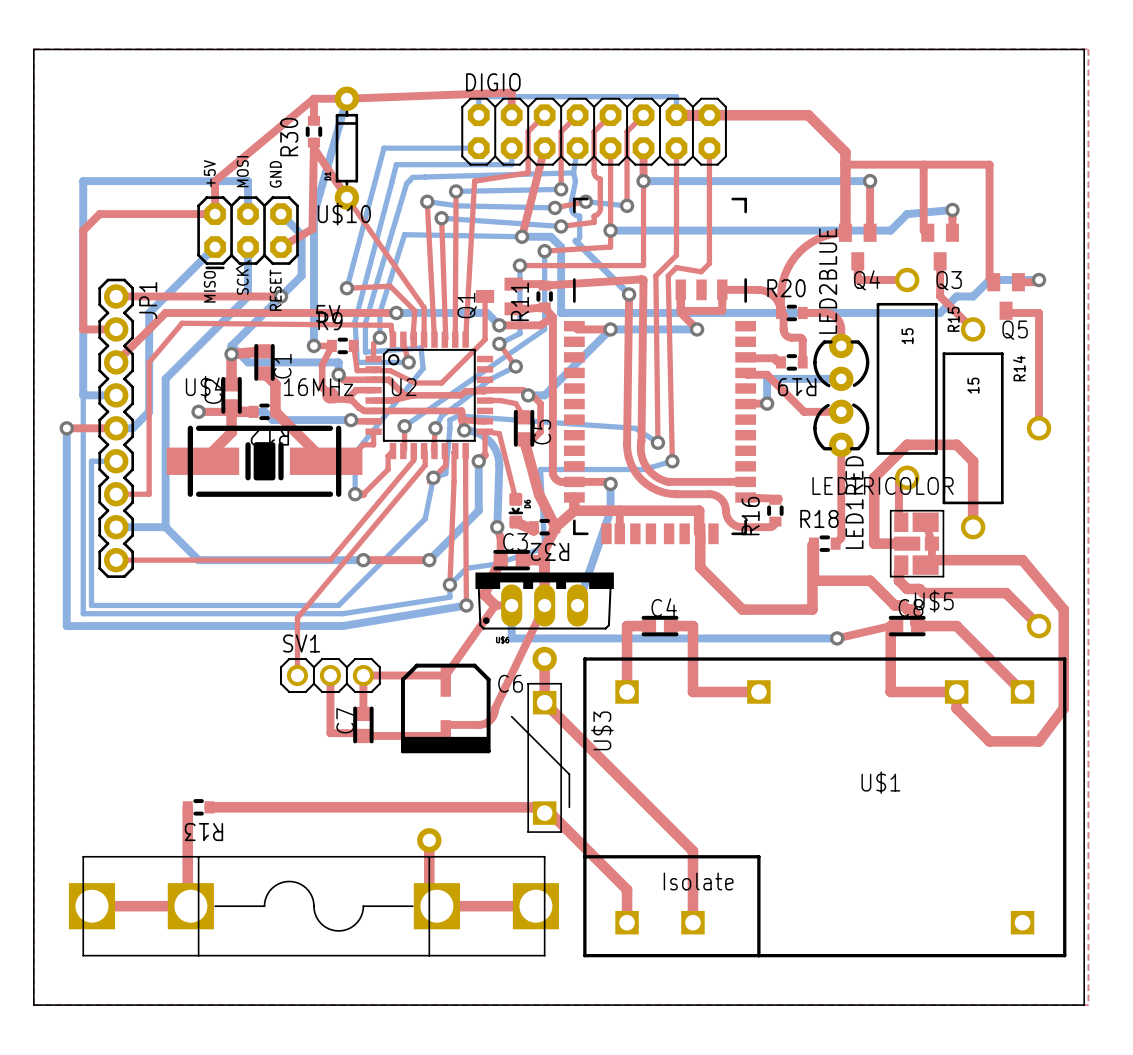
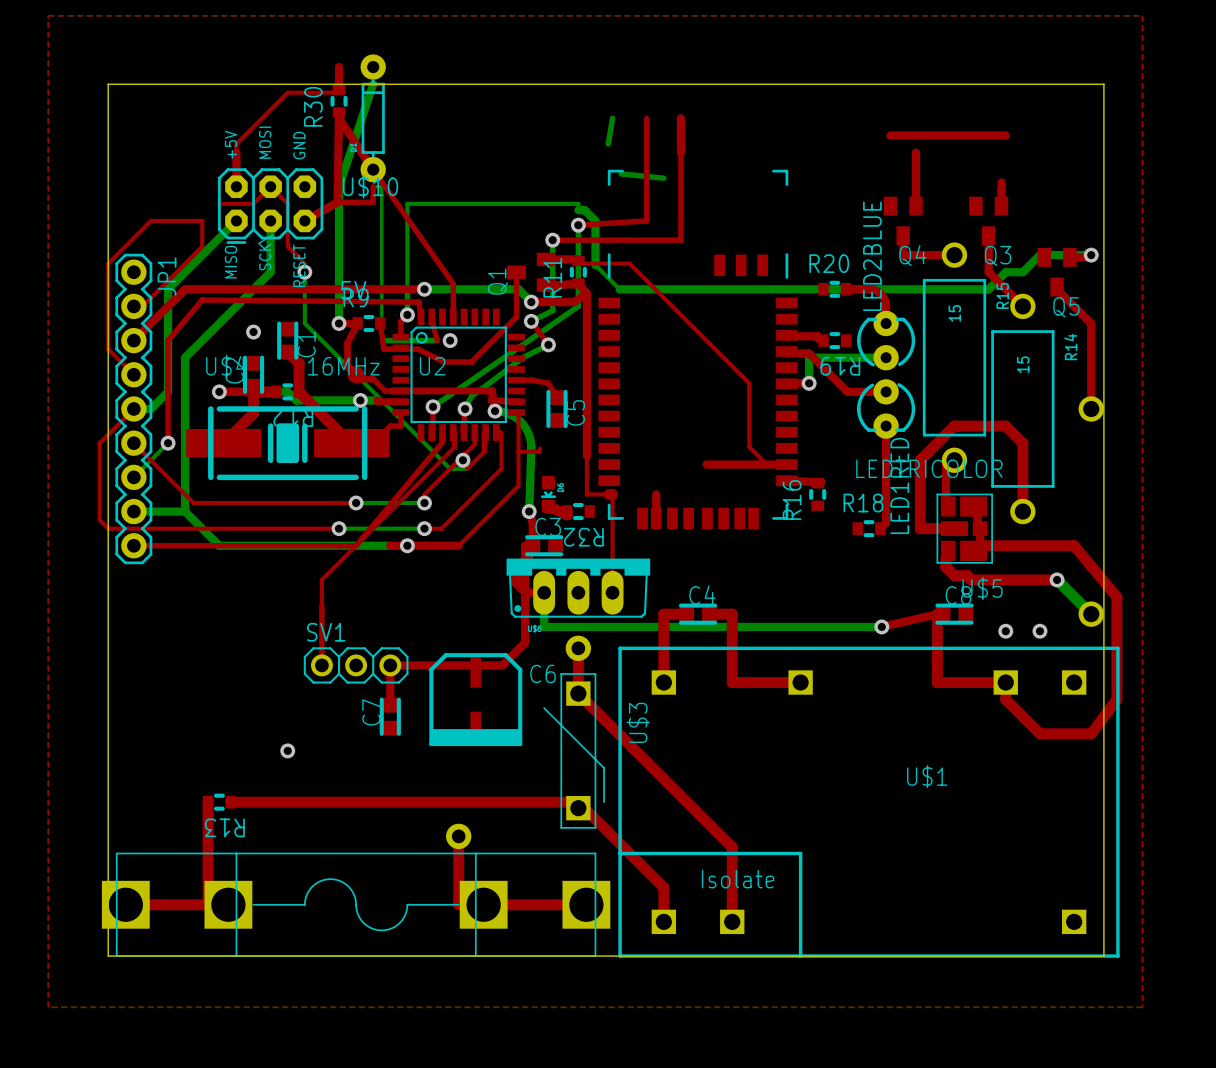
board edge: (33, 49) (1084, 49) (1084, 1005) (33, 1005) (33, 49) -> (108, 84) (108, 956) (1103, 956) (1103, 84) (108, 84)
bottom track: (346, 98) (313, 214) -> (373, 84) (339, 186)
bottom track: (478, 115) (478, 96) (676, 96) (676, 115) -> none
top track: (511, 115) (511, 92) (313, 98) (215, 181) -> (339, 89) (336, 92) (287, 92) (236, 143) (236, 152)
top track: (544, 115) (528, 131) (528, 172) (474, 181) (465, 339) -> none
top track: (577, 115) (561, 131) (561, 189) -> none
top track: (610, 115) (594, 131) (594, 172) (596, 176) (600, 179) (599, 211) (594, 216) (594, 222) (561, 226) -> none
top track: (643, 115) (627, 131) (627, 205) -> none
top track: (676, 115) (808, 115) (845, 152) (845, 232) (831, 234) (817, 239) (805, 246) (795, 257) (787, 269) (782, 282) (780, 312) -> none
DIGIO: (594, 131) -> none
bottom track: (478, 148) (383, 148) (346, 288) -> none
bottom track: (511, 148) (511, 164) (396, 164) (355, 321) (357, 362) -> (373, 186) (381, 186) (381, 340) (383, 340)
top track: (544, 148) (522, 236) -> none
top track: (676, 148) (676, 255) (655, 275) (657, 442) -> none
top track: (709, 148) (709, 263) (701, 271) (676, 267) (668, 275) (672, 461) -> none
top track: (923, 164) (923, 230) -> none
top track: (956, 164) (989, 164) (989, 278) (993, 282) -> none
bottom track: (409, 180) (412, 177) (573, 172) (575, 181) (571, 208) (574, 214) (579, 216) (579, 237) (575, 240) (629, 294) -> none
bottom track: (409, 180) (406, 183) (365, 323) (365, 352) (421, 347) (423, 368) (355, 453) (355, 494) -> none
bottom track: (643, 181) (870, 181) -> none
via: (643, 181) -> none
via: (870, 181) -> none
bottom track: (561, 189) (456, 191) -> none
via: (561, 189) -> none
top track: (456, 191) (455, 339) -> none
via: (456, 191) -> none
top track: (427, 201) (434, 339) -> none
bottom track: (427, 201) (458, 205) (554, 207) -> none
via: (427, 201) -> none
top track: (585, 201) (554, 207) -> none
via: (585, 201) -> none
via: (627, 205) -> none
via: (554, 207) -> none
bottom track: (952, 209) (907, 214) (890, 230) (610, 230) -> none
via: (952, 209) -> none
top track: (215, 214) (99, 214) (83, 230) (83, 329) (116, 329) -> (133, 374) (108, 349) (108, 263) (150, 220) (202, 220) (202, 246) (142, 306) (133, 306)
bottom track: (248, 214) (248, 181) (83, 181) (83, 395) -> none
bottom track: (281, 214) (301, 234) (301, 275) (231, 345) -> none
top track: none -> (373, 186) (373, 202) (337, 202)
top track: (441, 218) (445, 338) -> none
bottom track: (441, 218) (561, 226) -> none
via: (441, 218) -> none
via: (561, 226) -> none
top track: none -> (219, 203) (253, 203) (270, 186) (287, 203) (287, 246) (304, 263)
via: (610, 230) -> none
via: (522, 236) -> none
bottom track: (544, 236) (404, 234) (379, 312) -> (578, 210) (578, 203) (407, 203) (407, 289)
top track: (544, 285) (643, 280) (641, 454) (644, 462) (652, 473) (668, 481) -> (578, 260) (578, 263) (629, 263) (749, 383) (749, 446) (766, 464)
bottom track: none -> (304, 263) (304, 323) (450, 468) (467, 468)
top track: (346, 288) (390, 286) (414, 310) (412, 338) -> none
via: (346, 288) -> none
bottom track: (561, 289) (561, 312) (584, 312) -> (595, 265) (619, 289)
top track: (629, 294) (627, 444) (628, 457) (633, 469) (646, 484) (663, 492) (711, 494) (717, 496) (724, 504) (728, 518) (736, 525) (770, 527) (775, 521) -> none
via: (629, 294) -> none
top track: (116, 296) (281, 296) -> none
top track: (780, 312) (783, 314) (785, 334) (789, 337) (802, 339) (802, 362) -> none
top track: (780, 312) (779, 304) (774, 296) (766, 291) (757, 289) (722, 289) (721, 310) (682, 310) (681, 310) (680, 309) (680, 309) (680, 309) (680, 309) (680, 289) (680, 289) (680, 312) (697, 329) -> none
top track: (1006, 312) (1039, 312) (1039, 345) -> (1057, 289) (1091, 323)
top track: (574, 326) (577, 329) (610, 329) -> none
via: (610, 329) -> none
bottom track: (697, 329) (610, 329) (544, 395) (528, 395) -> none
via: (697, 329) -> none
bottom track: (231, 345) (248, 362) (338, 362) (338, 374) -> none
top track: (264, 351) (231, 354) (231, 384) -> none
via position: (408, 362) -> (450, 340)
top track: (338, 374) (343, 379) (389, 379) (404, 395) (460, 395) (466, 391) (522, 390) (528, 395) (532, 395) (540, 403) (540, 431) (526, 446) -> none
via: (338, 374) -> none
top track: (373, 390) (356, 390) (346, 399) (351, 399) (364, 410) -> (373, 379) (385, 390) (391, 390)
bottom track: (83, 395) (116, 395) -> none
bottom track: (83, 395) (83, 613) (342, 613) (449, 597) (449, 584) (466, 568) (495, 564) (544, 547) (540, 469) (643, 469) (672, 461) -> none
top track: (412, 395) (391, 400) (373, 400) -> none
via: (528, 395) -> none
via position: (351, 420) -> (360, 400)
top track: (66, 428) (116, 428) -> (339, 528) (108, 528) (99, 520) (99, 443) (133, 408)
bottom track: (66, 428) (66, 626) (342, 626) (466, 605) -> none
via: (66, 428) -> none
top track: none -> (516, 412) (518, 412) (518, 485) (458, 545)
top track: (524, 439) (539, 494) (555, 527) -> none
bottom track: (657, 442) (635, 428) (458, 415) (449, 420) (445, 473) (433, 477) (425, 518) (338, 605) (91, 605) (91, 461) (116, 461) -> none
via: (657, 442) -> none
top track: (392, 451) (388, 455) (388, 469) (363, 494) (355, 494) -> none
top track: (465, 451) (466, 605) -> (496, 432) (501, 432) (501, 468) (441, 528) (424, 528)
top track: (444, 452) (445, 465) (429, 481) -> (474, 433) (474, 444) (424, 494) (424, 503)
top track: none -> (133, 443) (193, 503) (356, 503)
top track: (149, 461) (149, 494) (116, 494) -> none
bottom track: none -> (168, 443) (133, 477)
via: none -> (168, 443)
top track: (478, 461) (485, 455) (485, 431) (499, 433) (515, 499) -> none
bottom track: (478, 461) (478, 510) (429, 560) -> none
via: (478, 461) -> none
via: (672, 461) -> none
top track: (425, 465) (297, 617) -> (454, 447) (321, 579) (321, 605)
top track: none -> (539, 448) (539, 451) (518, 451)
top track: (454, 469) (449, 584) -> (484, 451) (467, 468)
top track: (552, 473) (555, 478) (561, 481) (610, 481) (610, 483) -> (586, 455) (586, 494) (609, 494)
bottom track: (610, 483) (610, 510) (577, 605) -> none
via: (610, 483) -> none
via: (355, 494) -> none
top track: (574, 497) (574, 510) (555, 527) -> none
top track: (577, 510) (699, 510) (700, 567) (742, 609) (812, 609) (813, 543) (813, 578) (816, 580) (870, 580) (894, 605) (903, 605) (907, 609) (911, 609) (915, 613) (915, 623) (918, 626) (956, 626) (1022, 691) -> (612, 494) (612, 592)
bottom track: none -> (356, 503) (424, 503)
via: none -> (356, 503)
via: none -> (424, 503)
top track: (555, 527) (543, 551) (544, 572) -> none
bottom track: none -> (339, 528) (424, 528)
via: none -> (339, 528)
via: none -> (424, 528)
via position: (363, 560) -> (407, 545)
via: (429, 560) -> none
top track: (522, 560) (544, 560) (544, 605) (495, 708) (493, 714) (486, 722) (478, 724) (445, 724) (445, 735) (363, 735) (363, 733) (330, 733) (330, 675) -> none
via: (449, 584) -> none
top track: (1006, 593) (1039, 626) -> none
bottom track: none -> (1057, 579) (1091, 614)
via: none -> (1057, 579)
via: (466, 605) -> none
top track: (493, 608) (445, 675) -> (532, 545) (525, 545) (525, 642) (502, 665) (475, 665)
via: none -> (1005, 631)
via: none -> (1039, 631)
via: none -> (287, 750)
part position: (313, 906) -> (356, 904)

